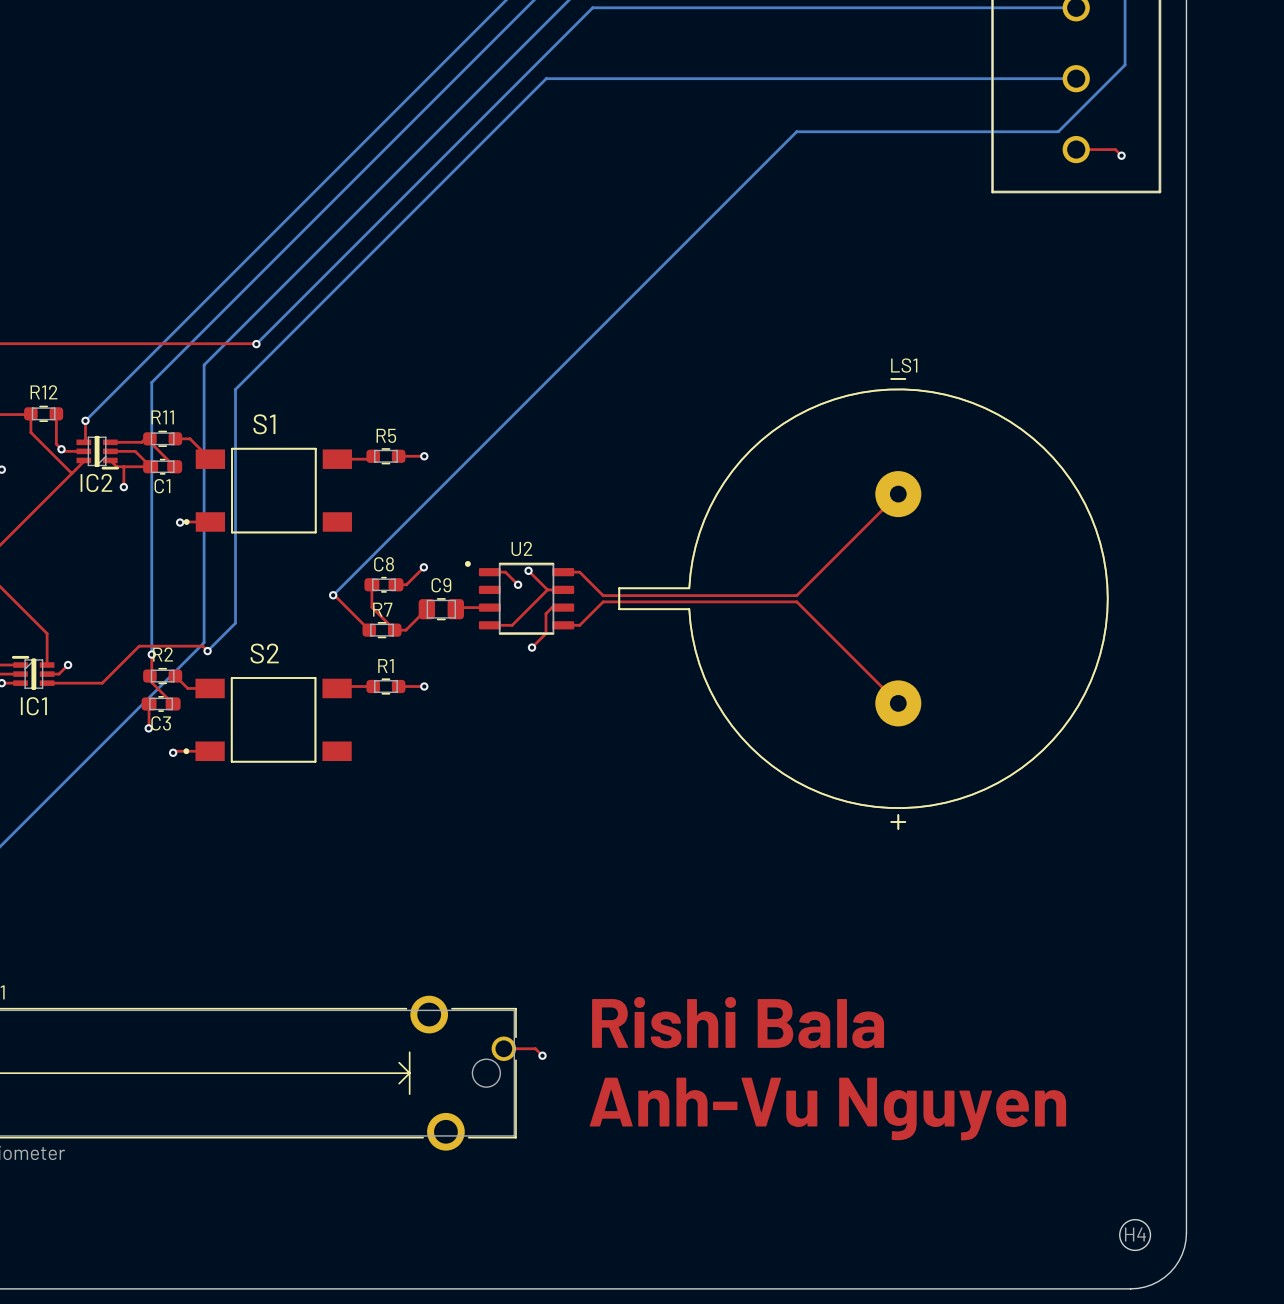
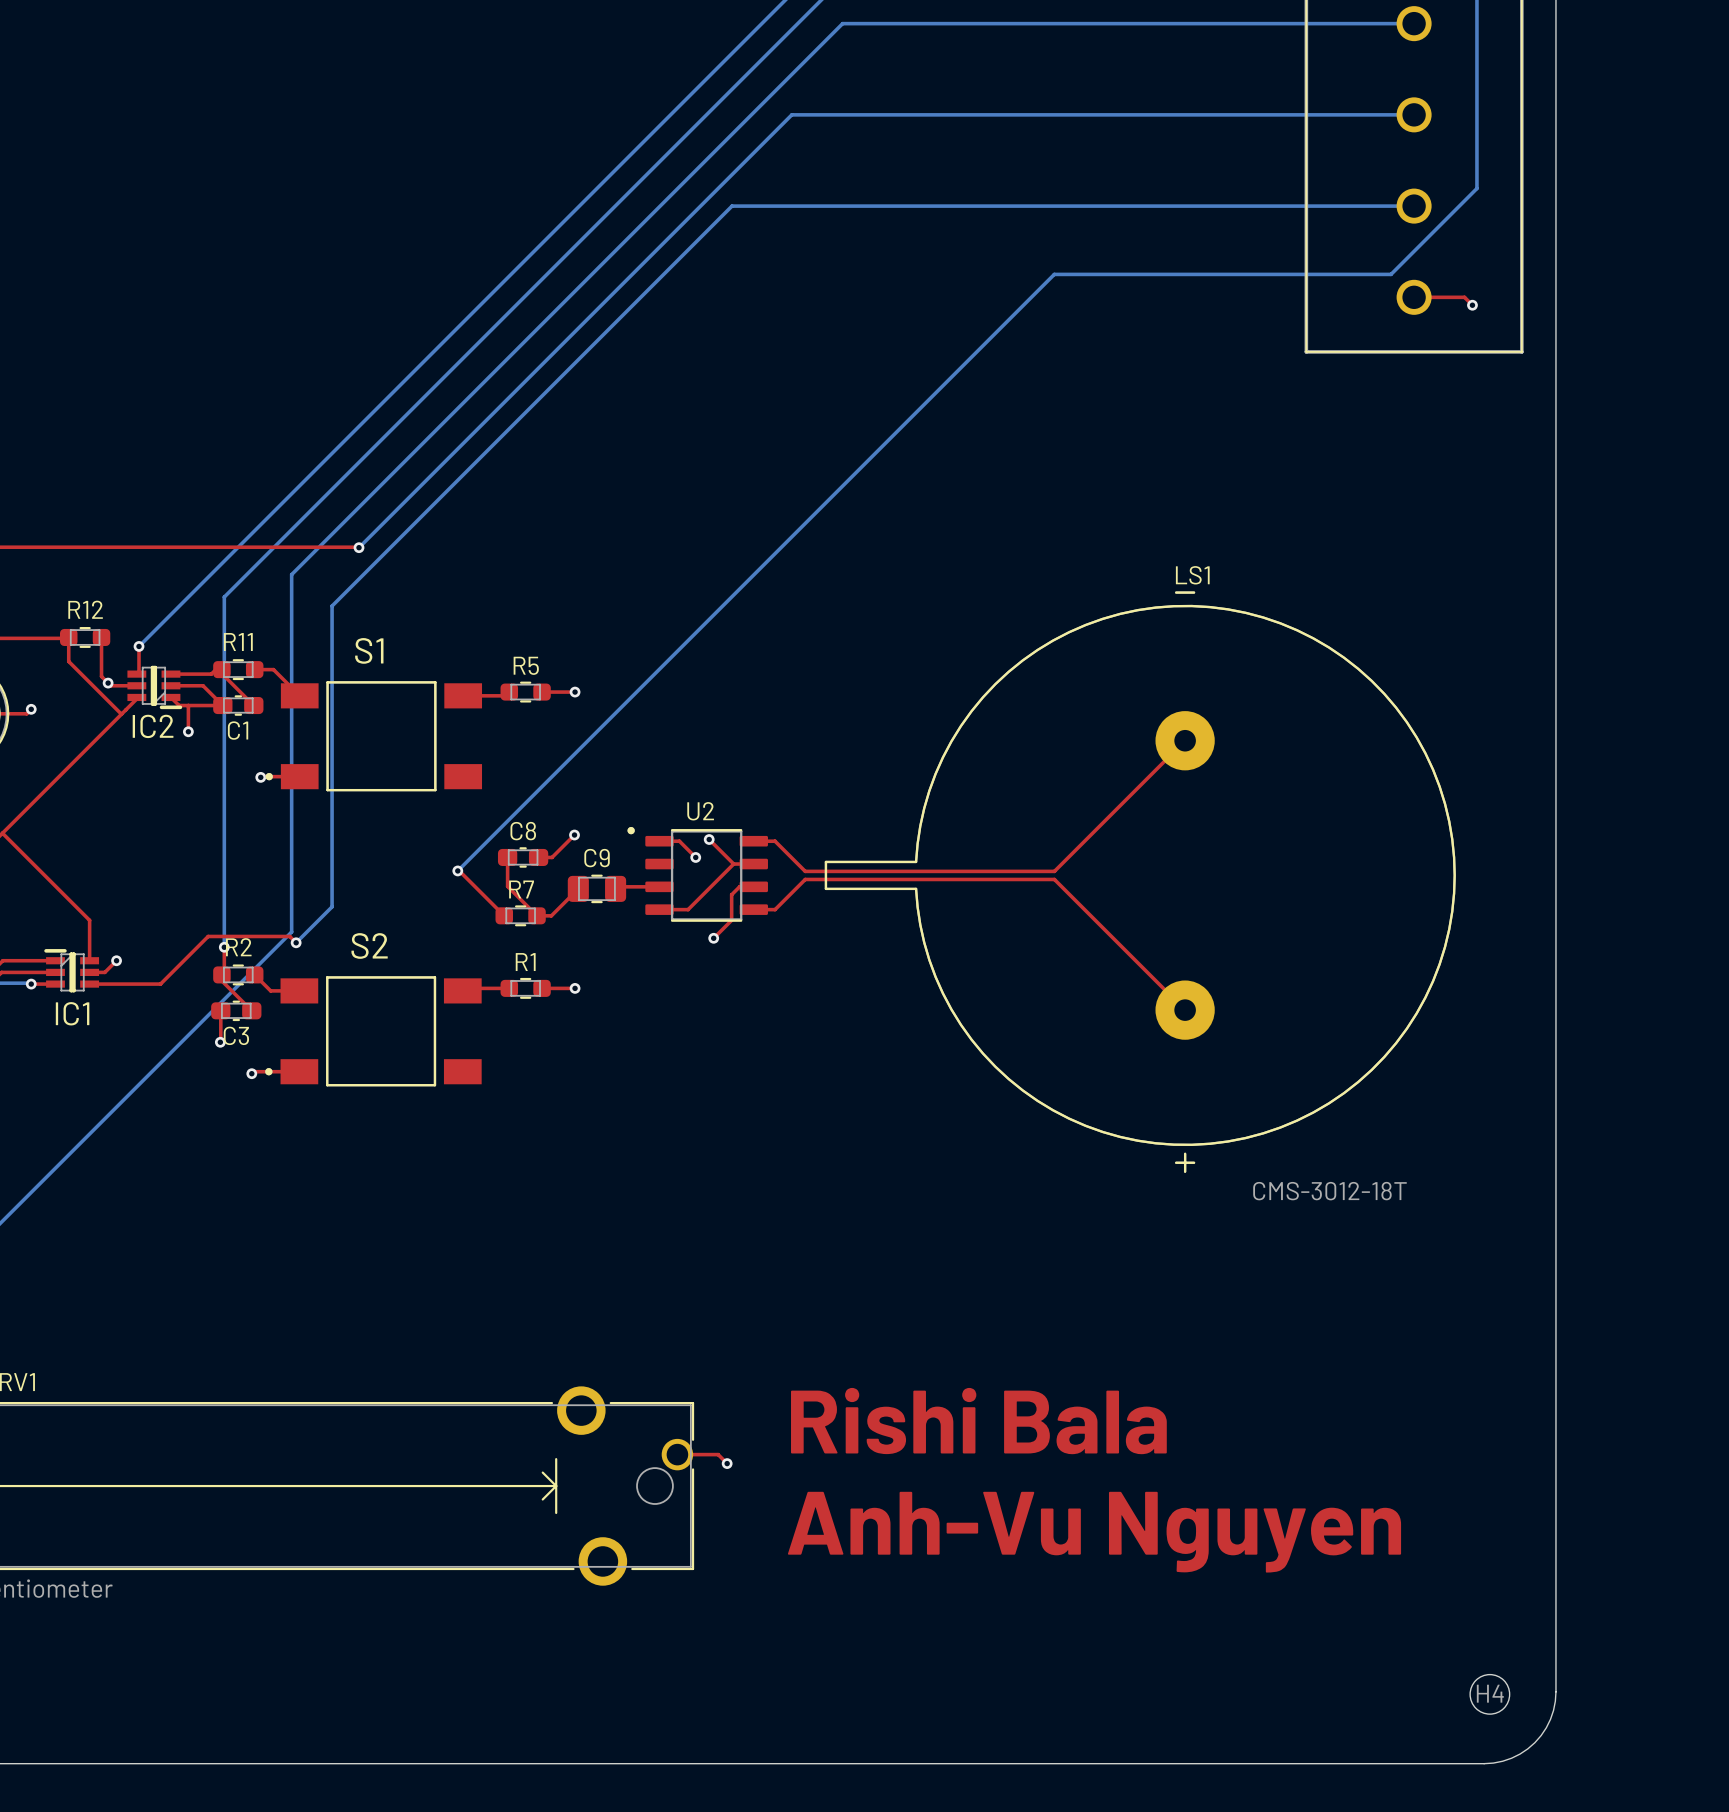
LS1 value: none -> CMS-3012-18T (1329, 1191)

